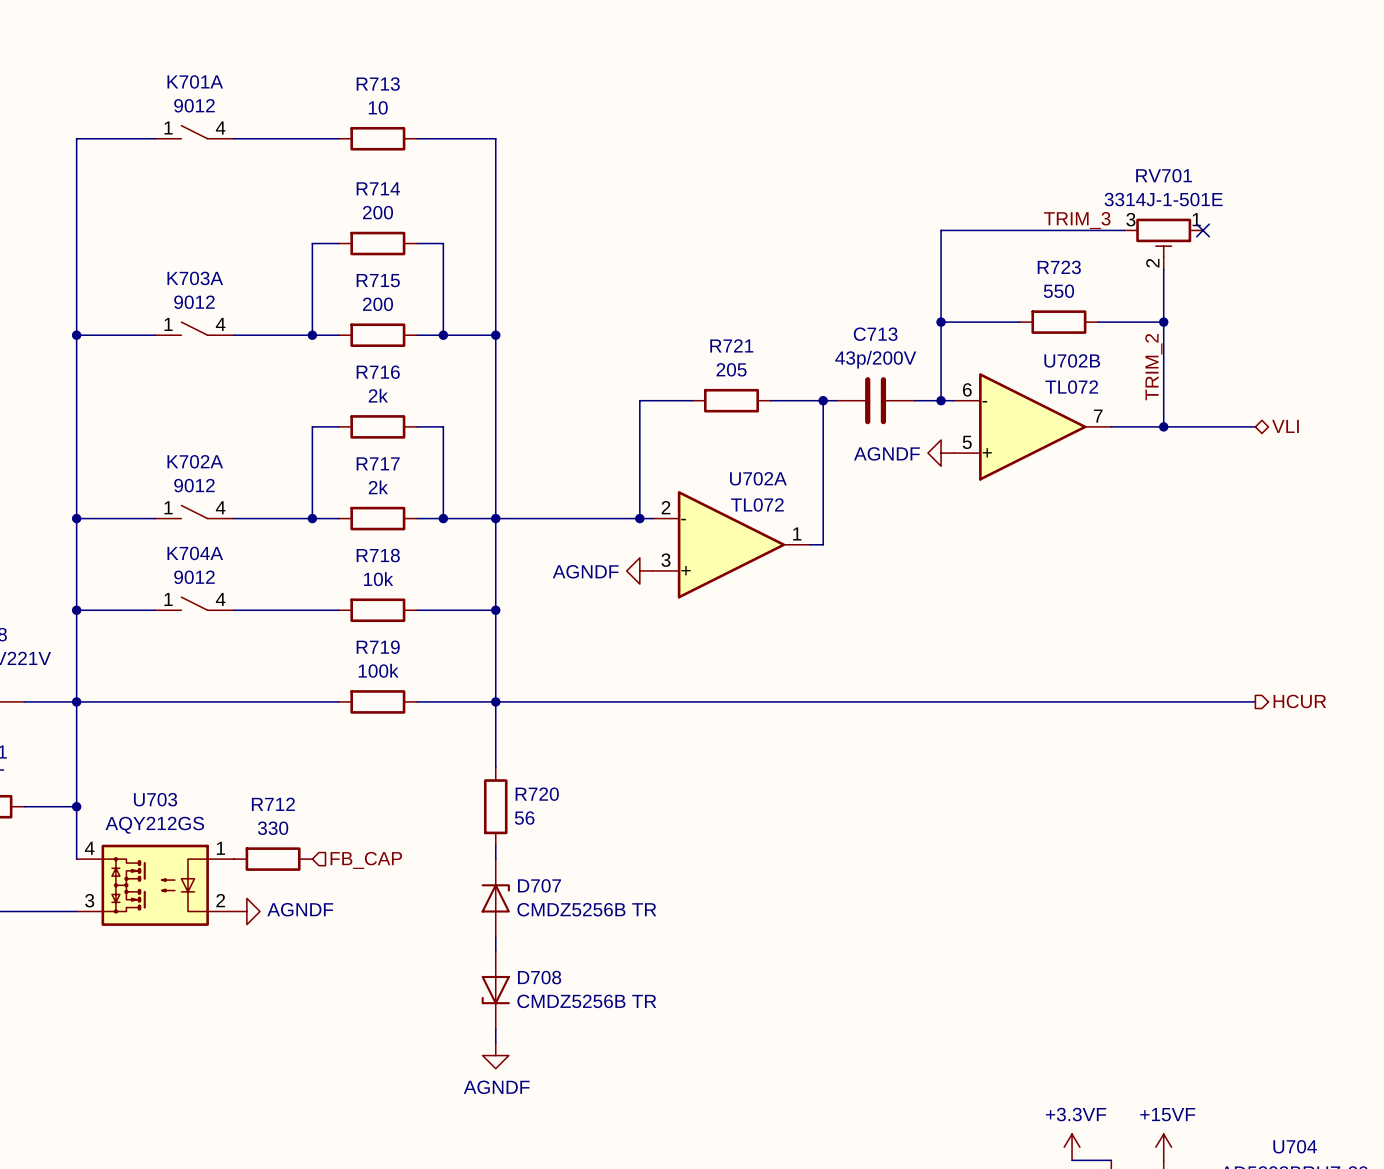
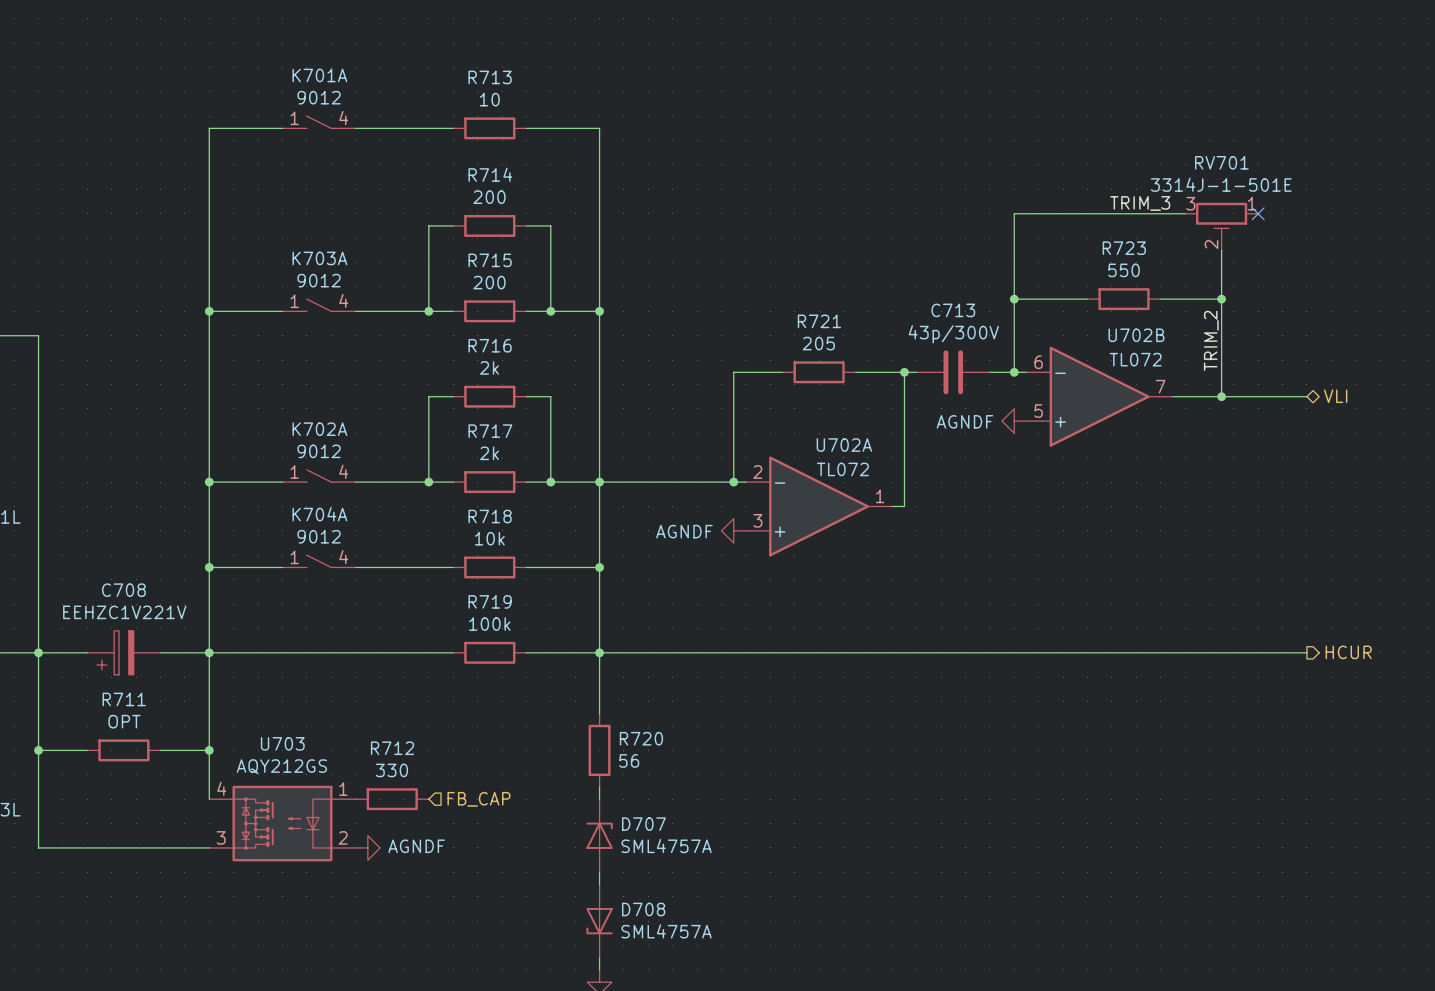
C713 value: 43p/200V (875, 359) -> 43p/300V (953, 334)
D707 value: CMDZ5256B TR (586, 909) -> SML4757A (666, 846)
D708 value: CMDZ5256B TR (586, 1001) -> SML4757A (666, 931)

